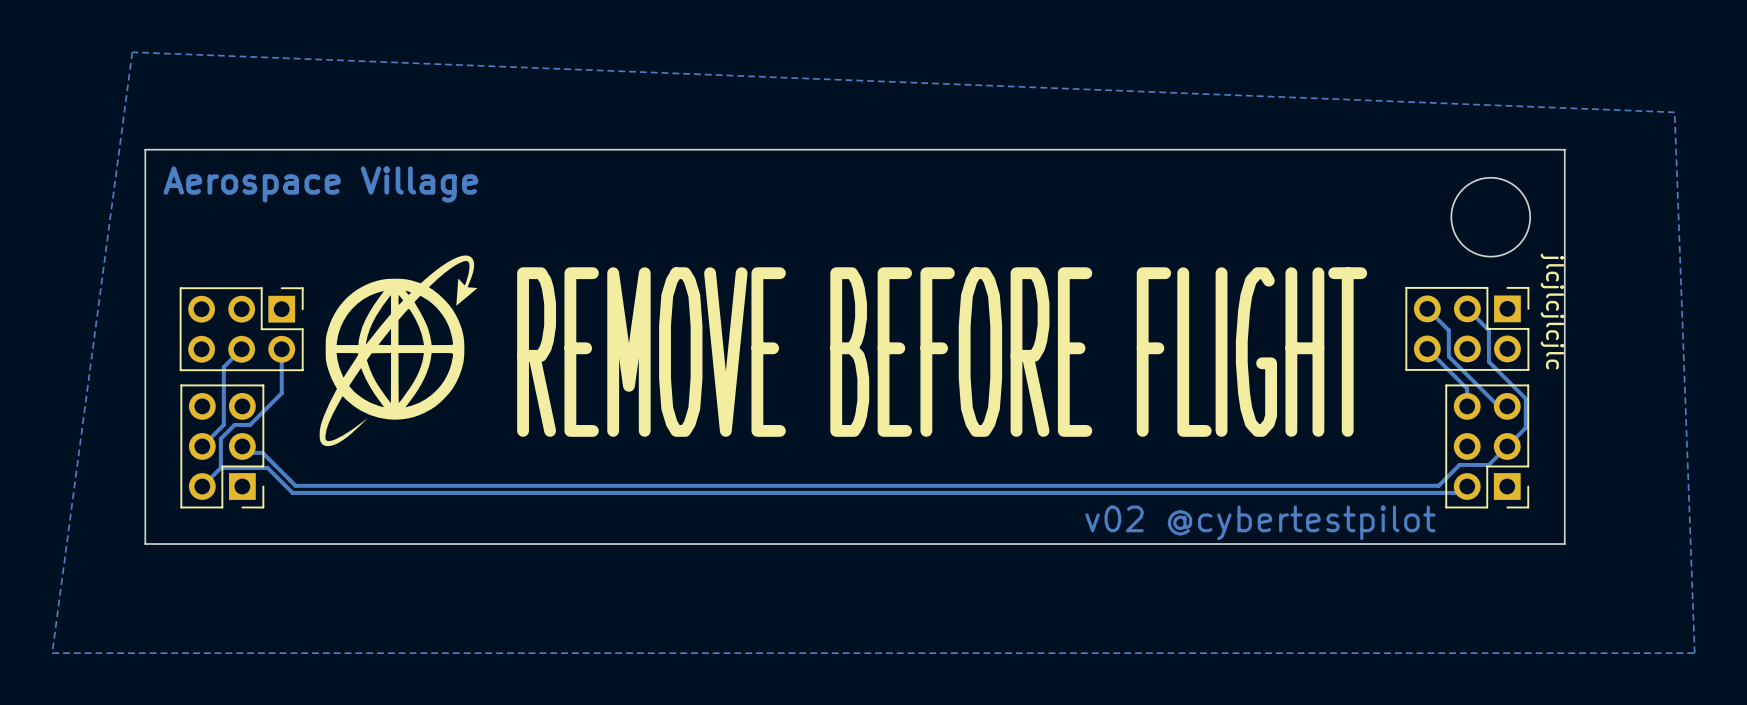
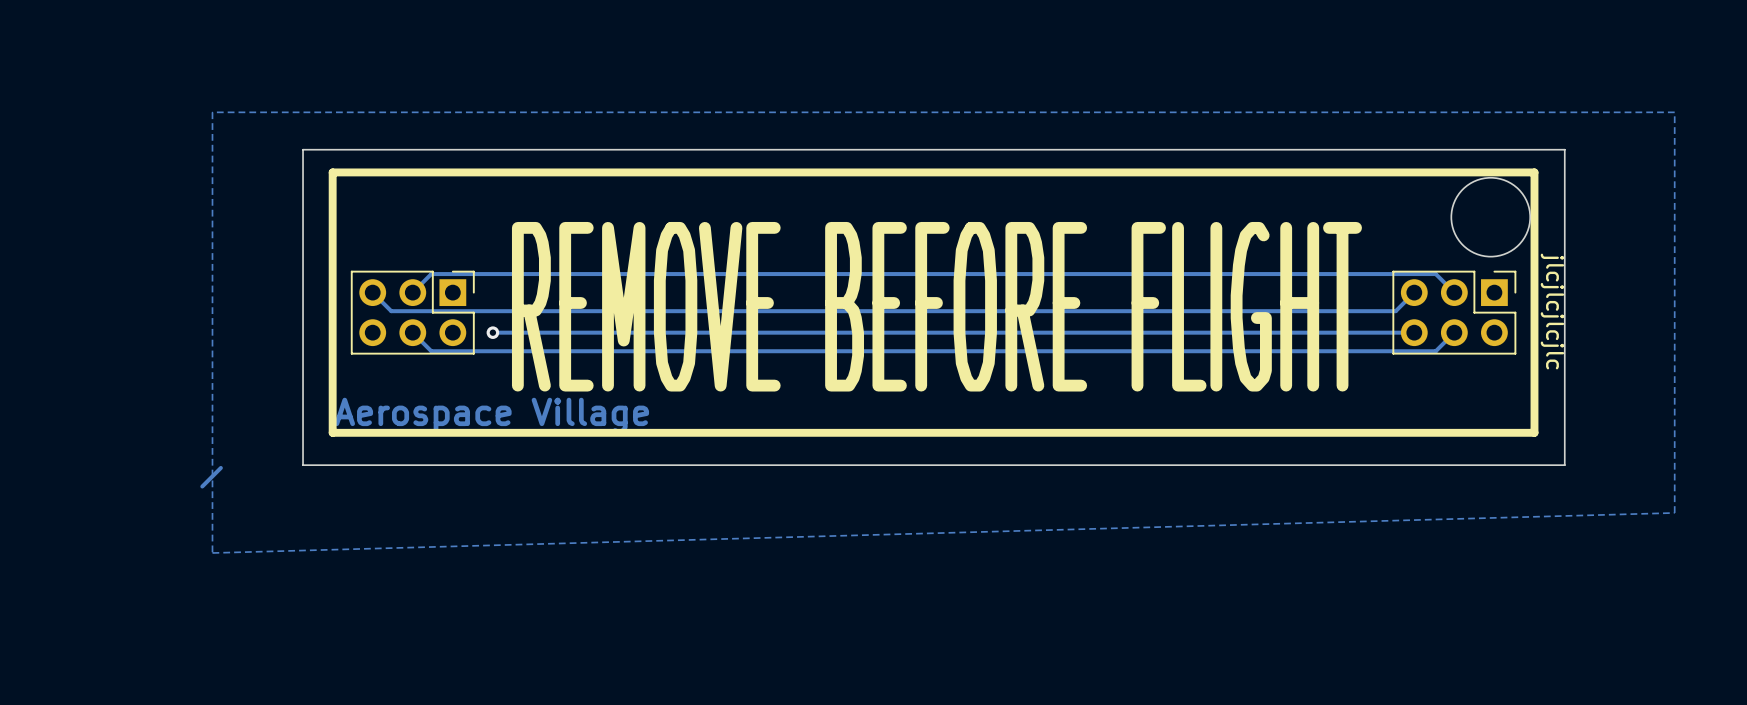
zone outline: (132, 52) (1674, 112) (1694, 653) (52, 653) (132, 52) -> (1674, 112) (1674, 512) (212, 553) (212, 112) (1674, 112)
board edge: (303, 149) (145, 149) (145, 544) (1564, 544) (1564, 465) -> (303, 149) (303, 465) (1564, 465)
line: none -> (1534, 172) (332, 172) (332, 432) (1534, 432) (1534, 172)
text position: Aerospace Village (320, 184) -> Aerospace Village (491, 415)
drawing: [319, 255, 478, 447] -> none
track: none -> (1414, 292) (1395, 311) (391, 311) (372, 292)
track: none -> (1454, 292) (1435, 274) (431, 274) (412, 292)
track: (1427, 308) (1448, 330) (1448, 356) (1498, 406) (1507, 406) -> none
track: (1467, 308) (1488, 330) (1488, 361) (1525, 398) (1525, 427) (1488, 464) (1459, 464) (1438, 485) (295, 485) (289, 480) -> none
part: none -> (412, 312)
part position: (1467, 328) -> (1454, 312)
part: (241, 329) -> none
via: none -> (492, 332)
track: none -> (1414, 332) (492, 332)
track: none -> (1454, 332) (1435, 351) (431, 351) (412, 332)
track: (1427, 348) (1467, 388) (1467, 406) -> none
track: (241, 349) (223, 367) (223, 424) (202, 446) -> none
track: (281, 349) (281, 393) (250, 424) (234, 424) (220, 438) (220, 467) (267, 467) (292, 492) (1460, 492) (1467, 486) -> none
text position: REMOVE BEFORE FLIGHT (942, 352) -> REMOVE BEFORE FLIGHT (936, 306)
part: (222, 446) -> none
track: (242, 446) (246, 446) (252, 452) (262, 452) (292, 482) -> none
part: (1487, 446) -> none
text: v02 @cybertestpilot (1260, 522) -> none

